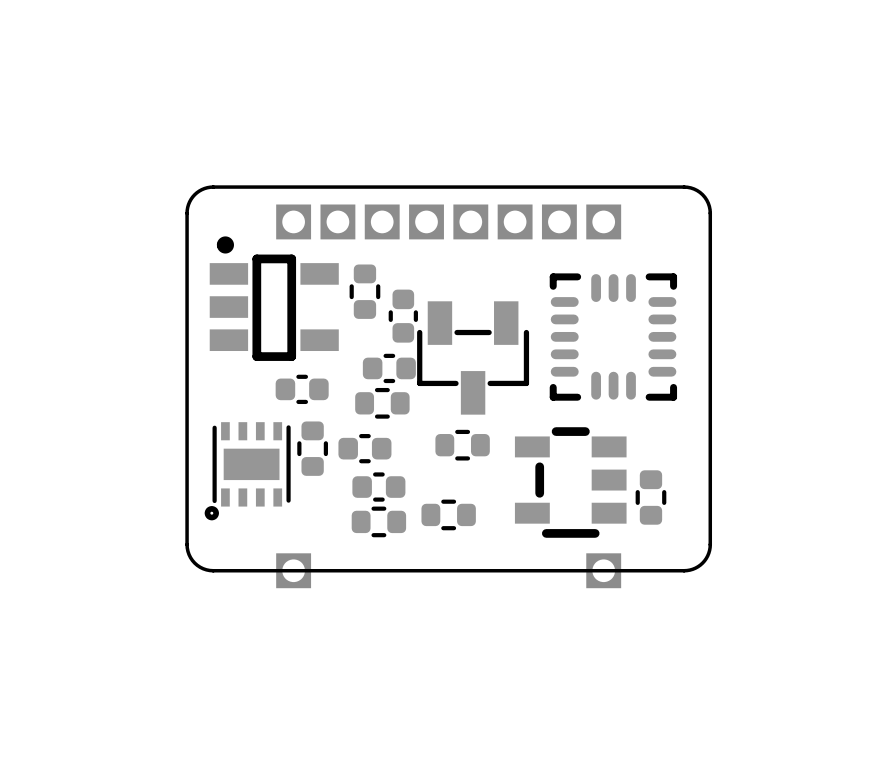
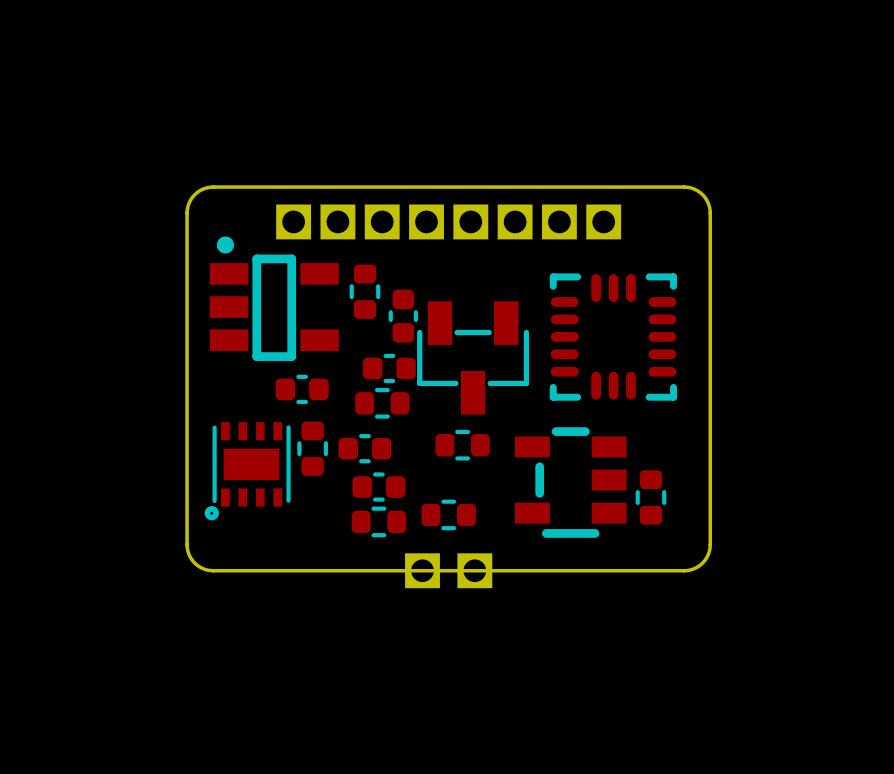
part: (293, 570) -> none
part: none -> (422, 570)
part: none -> (474, 570)
part: (603, 570) -> none

